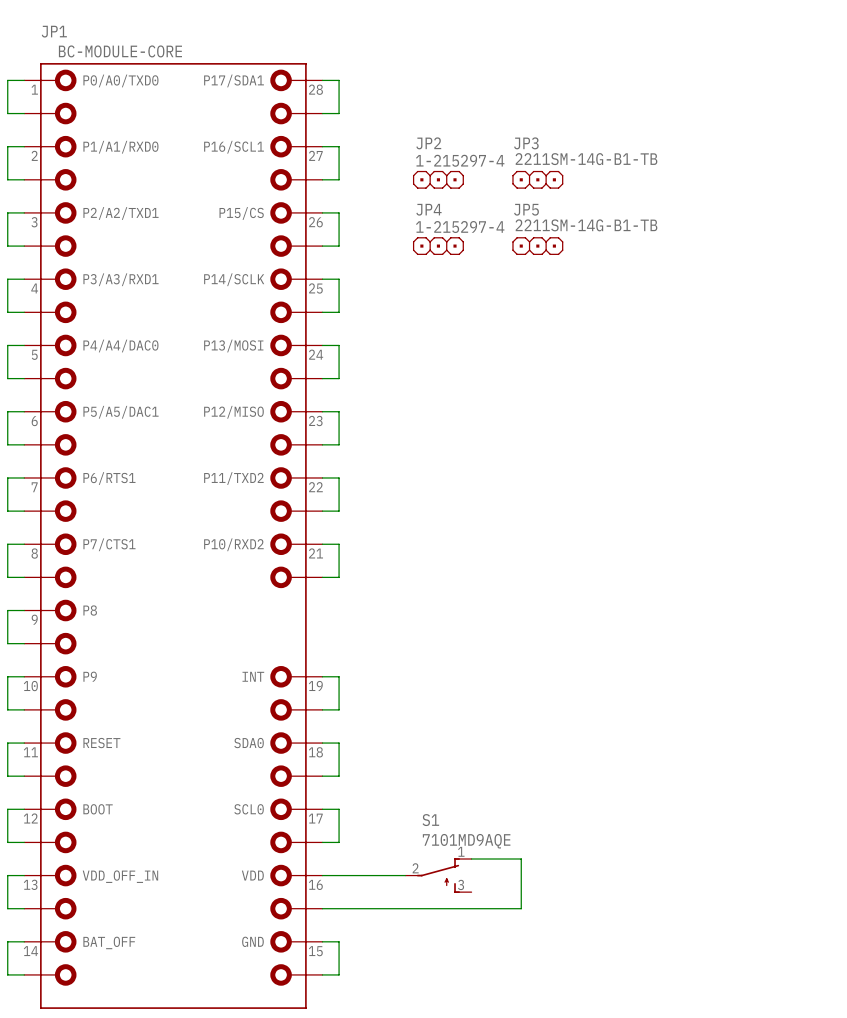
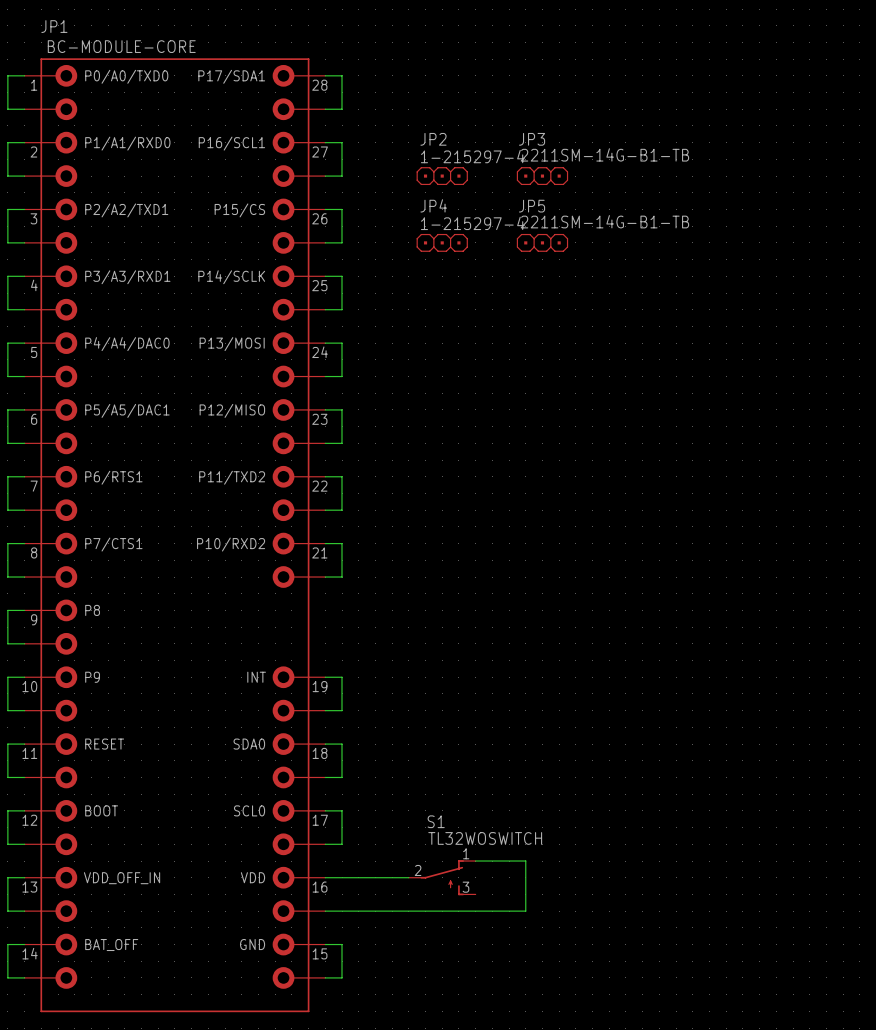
S1 value: 7101MD9AQE (466, 841) -> TL32WOSWITCH (485, 838)

